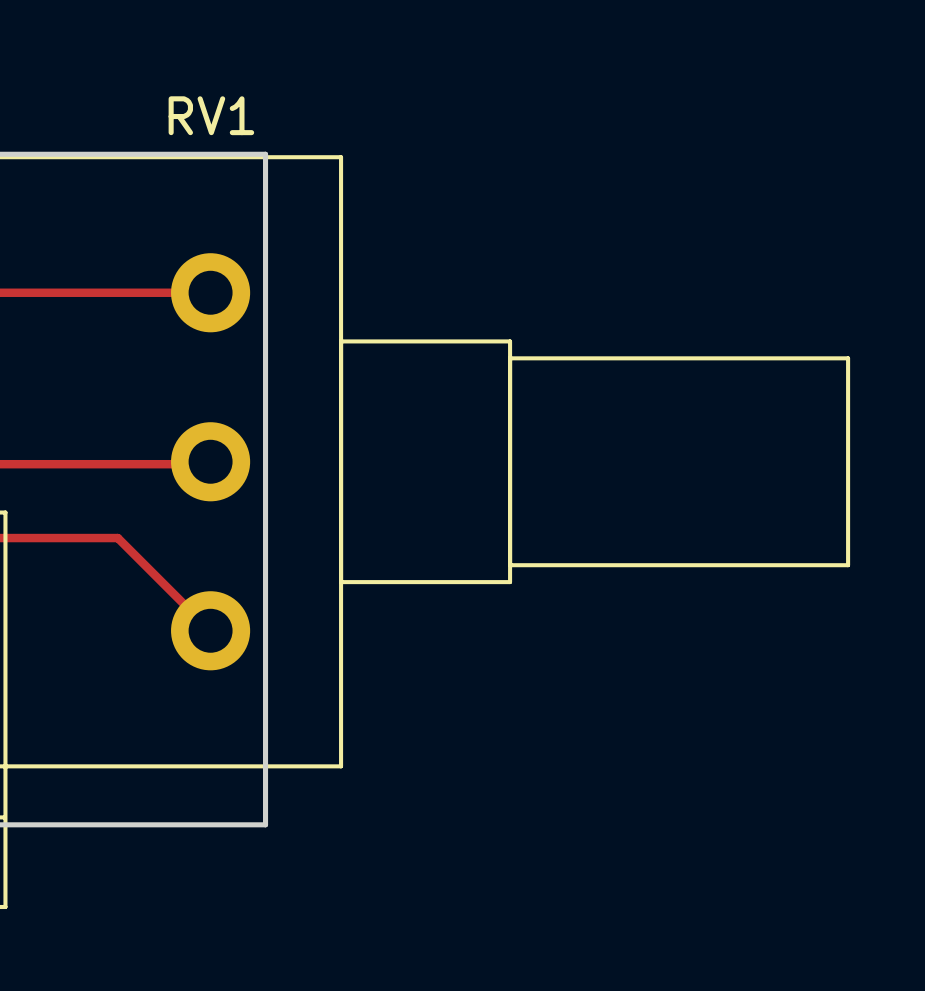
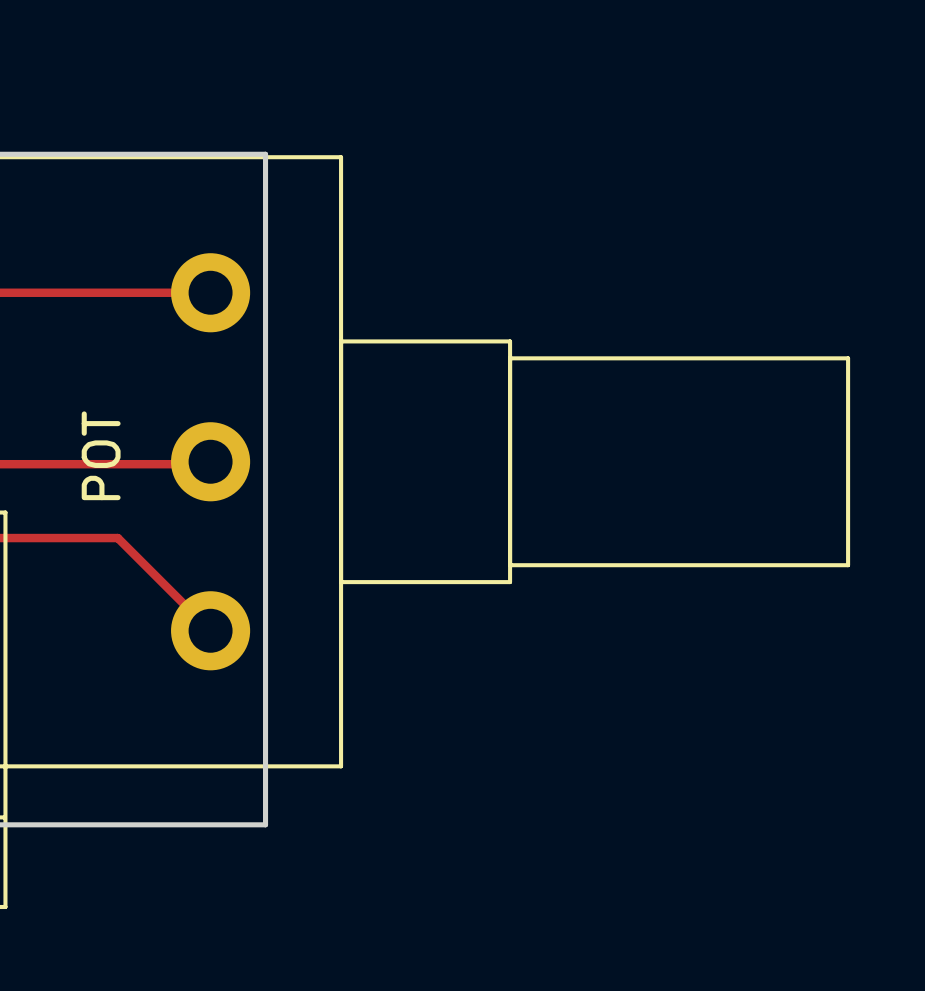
RV1 name: RV1 (211, 115) -> POT (101, 455)

